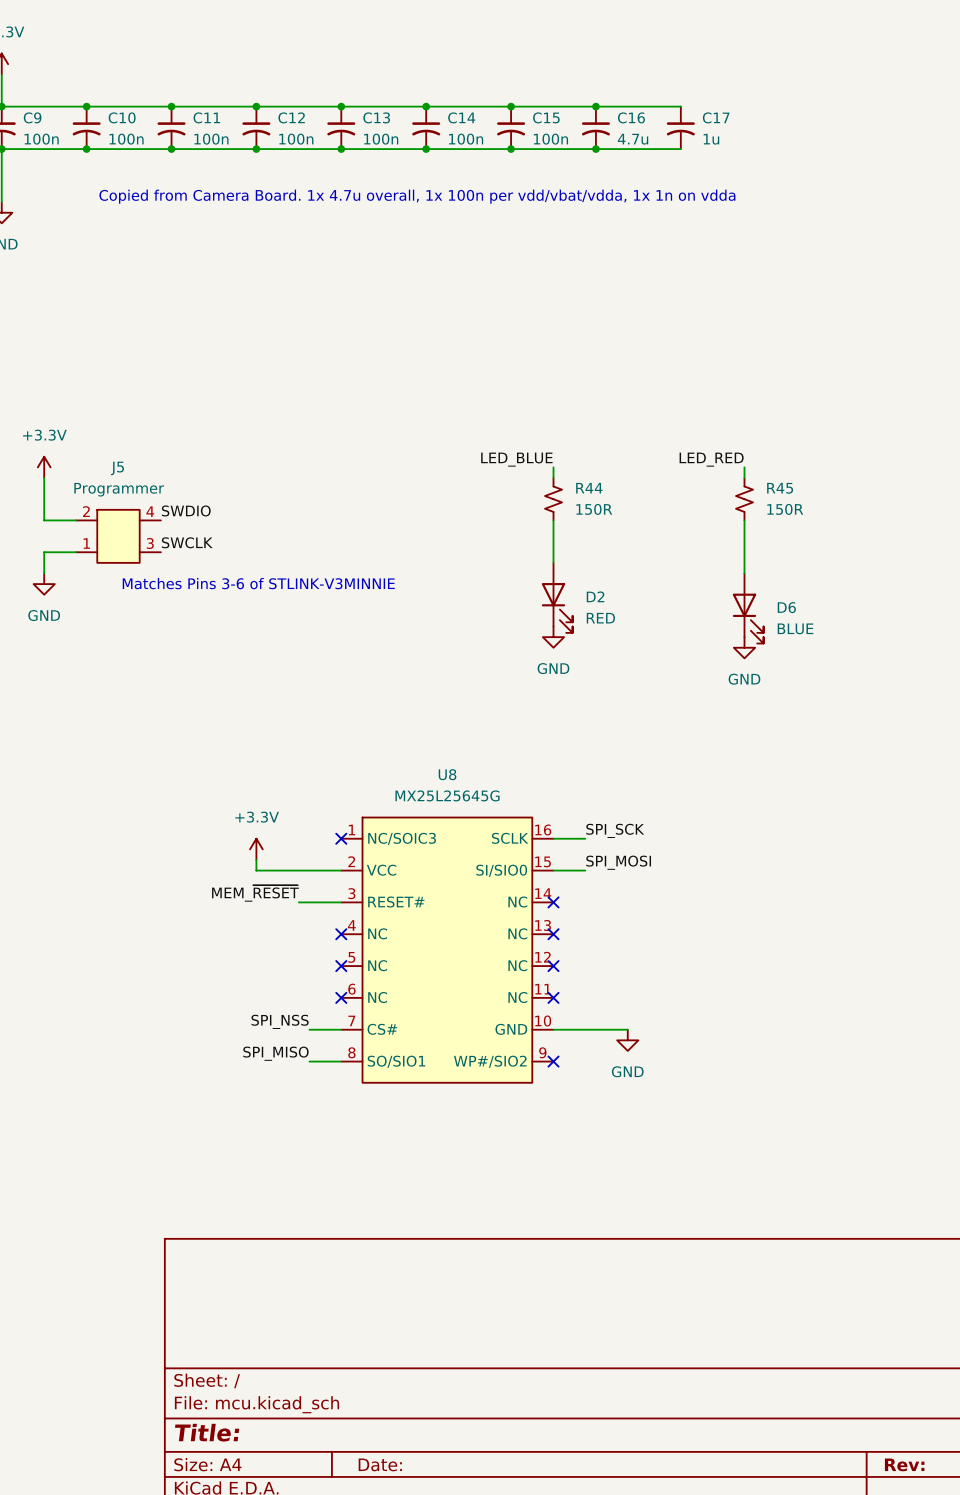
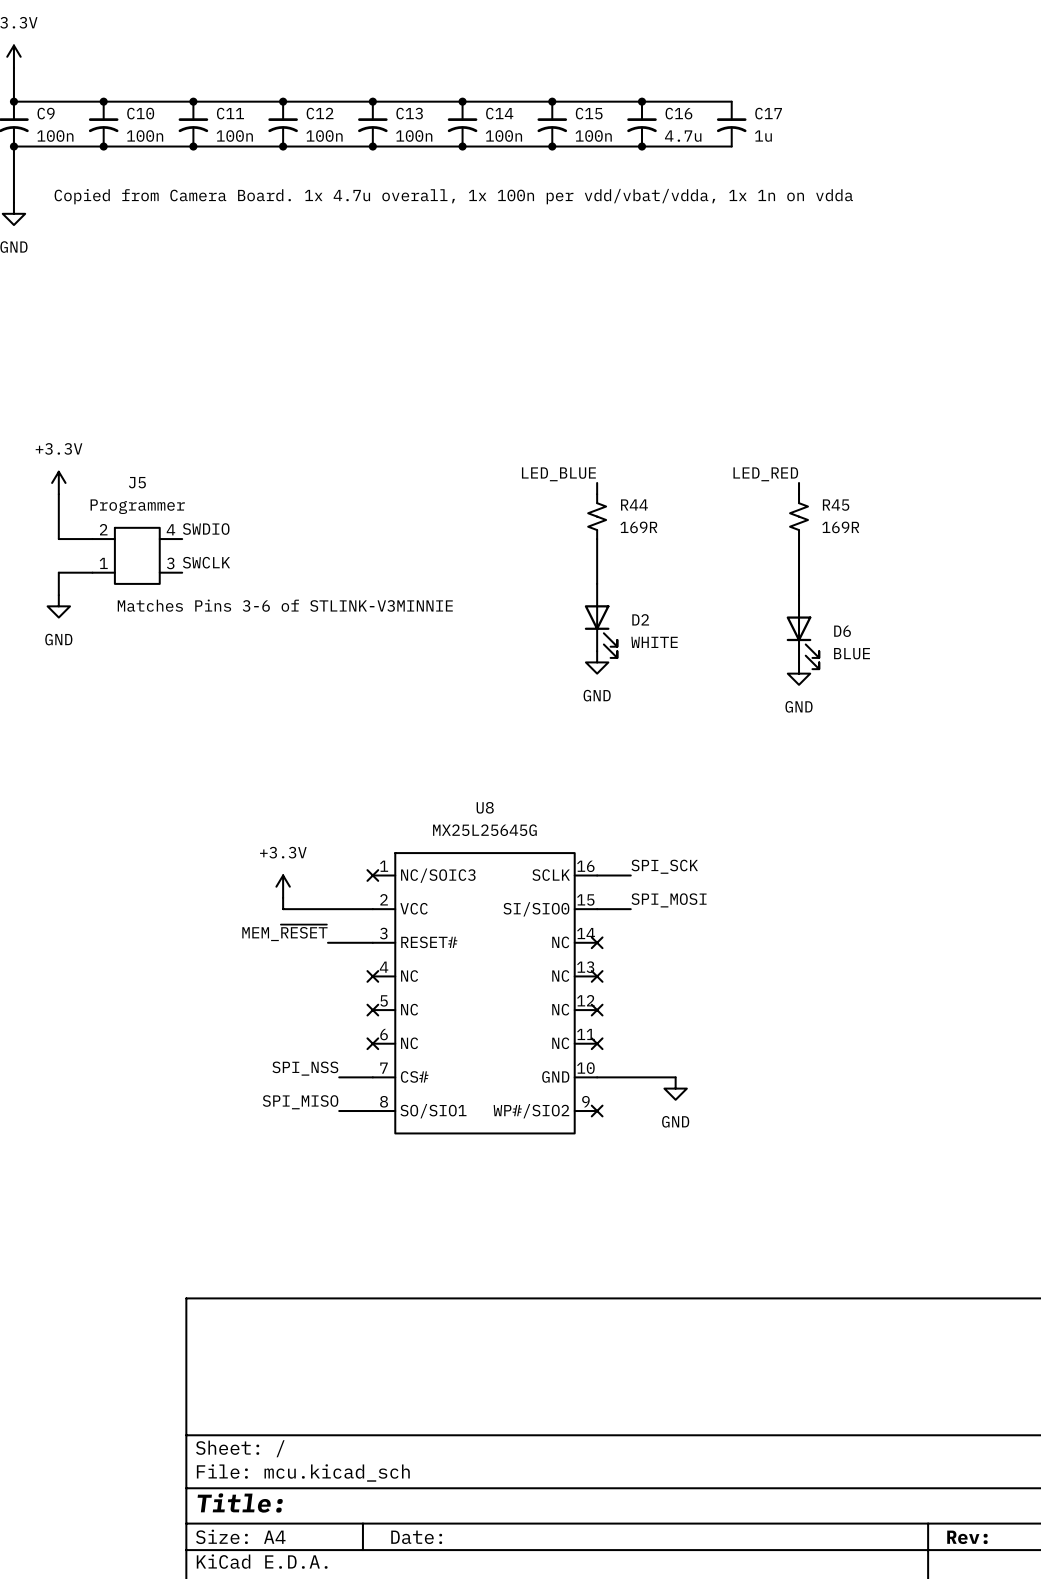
R44 value: 150R (594, 509) -> 169R (638, 527)
R45 value: 150R (785, 509) -> 169R (840, 527)
D2 value: RED (600, 618) -> WHITE (654, 642)

